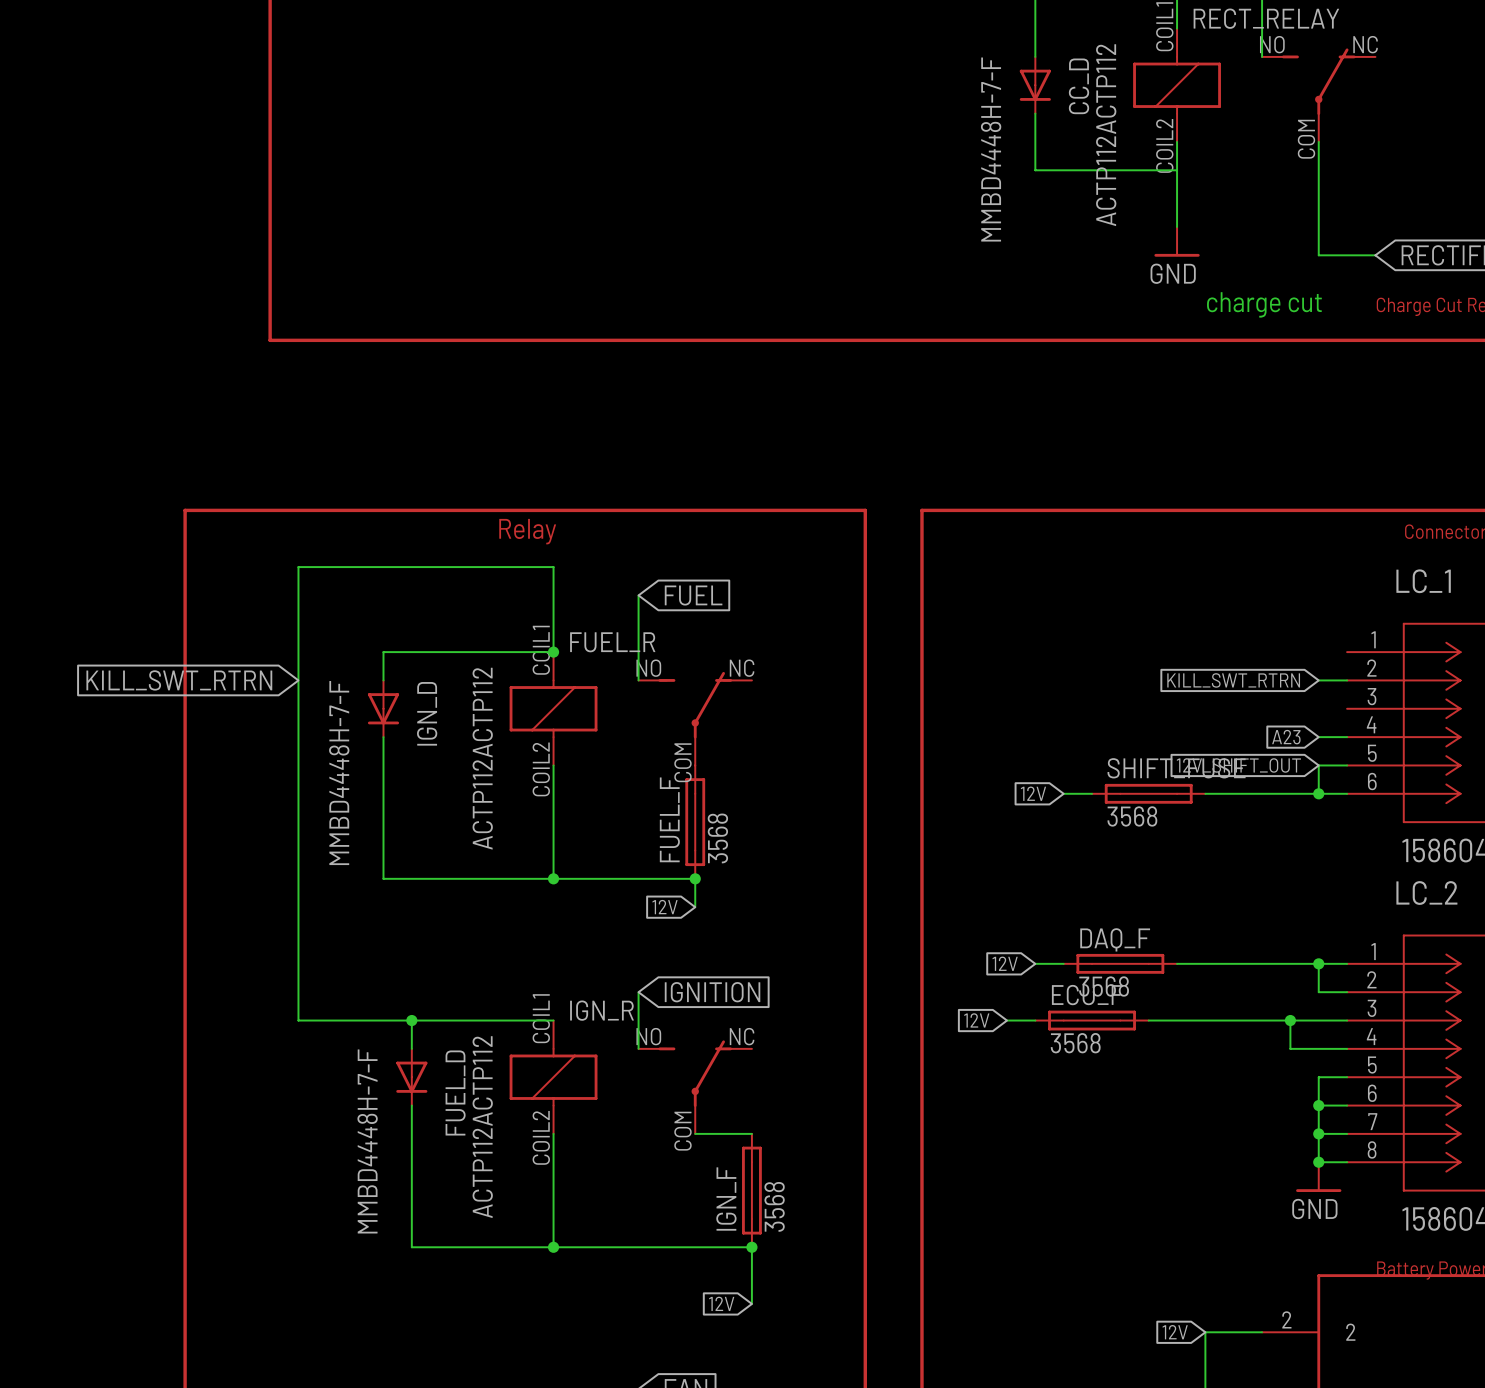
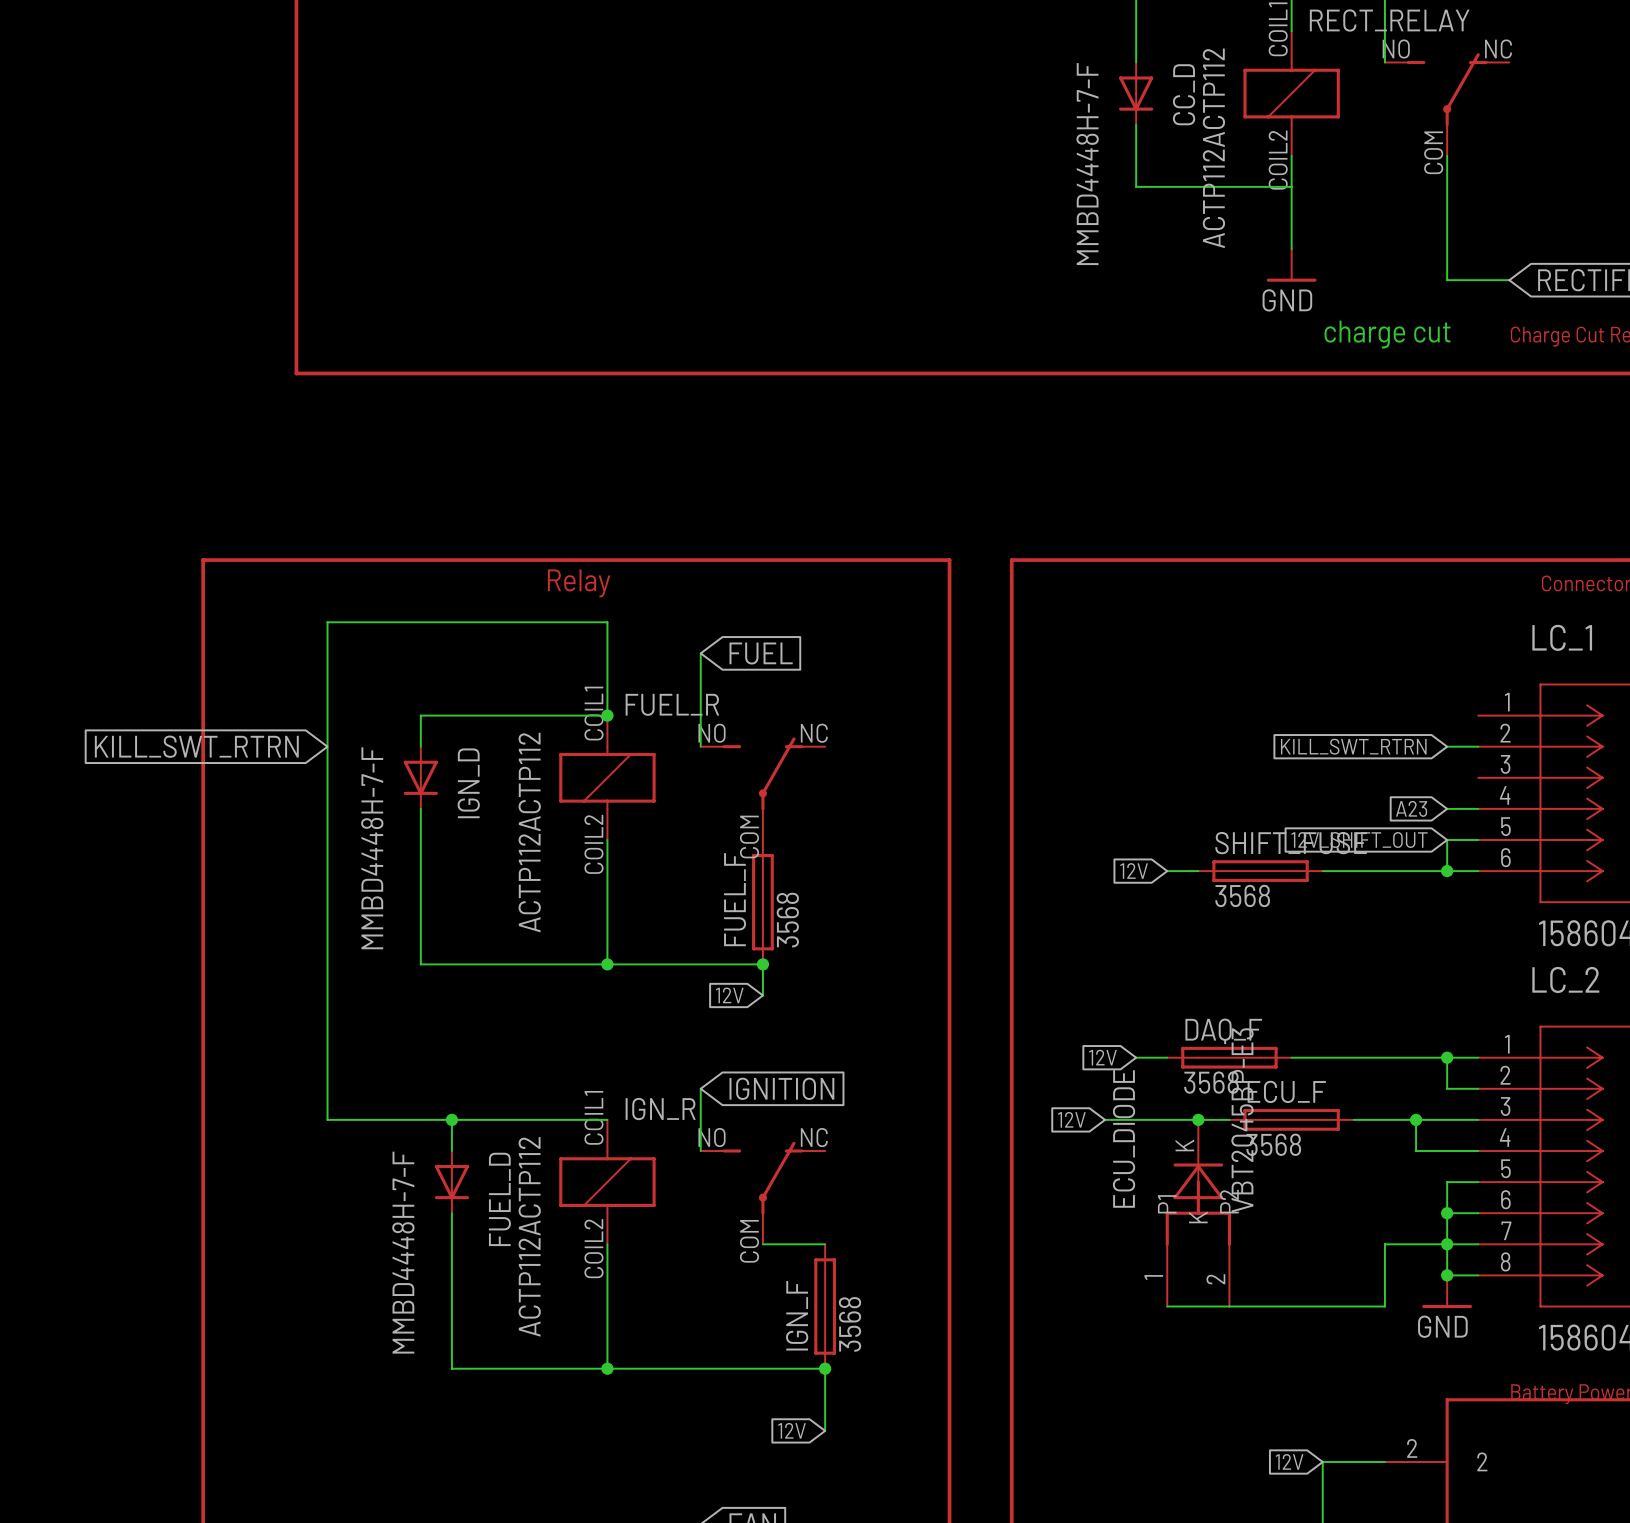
ECU_F position: (1092, 1020) -> (1291, 1119)
junction: none -> (1198, 1119)
ECU_DIODE: none -> VBT2045BP-E3 (1198, 1213)
wire: none -> (1447, 1244) (1384, 1244) (1384, 1306) (1167, 1306)

